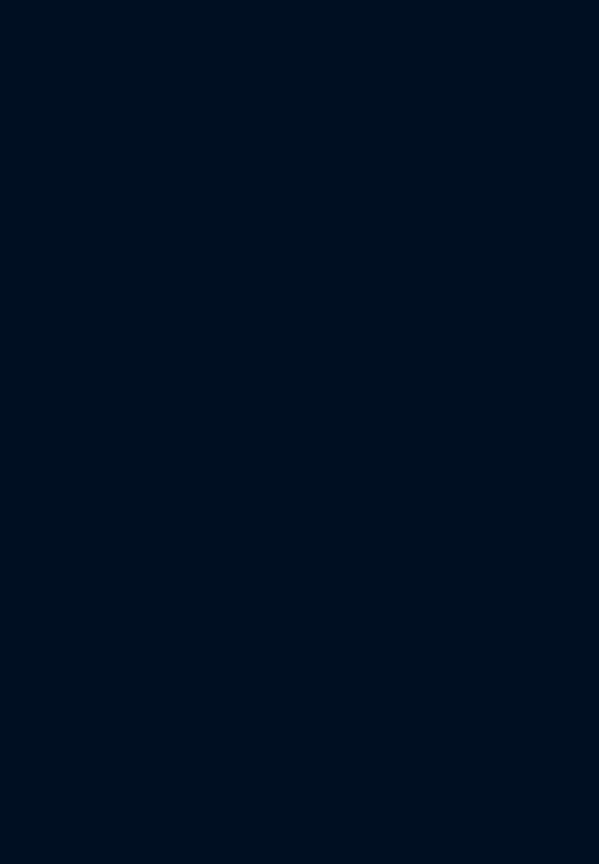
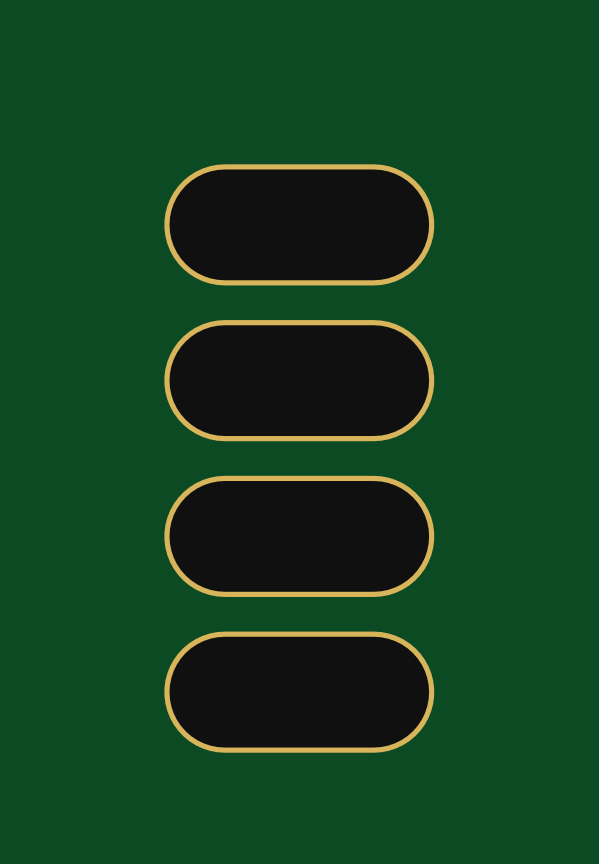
part: none -> (299, 224)
part: none -> (299, 380)
part: none -> (299, 536)
part: none -> (299, 692)

